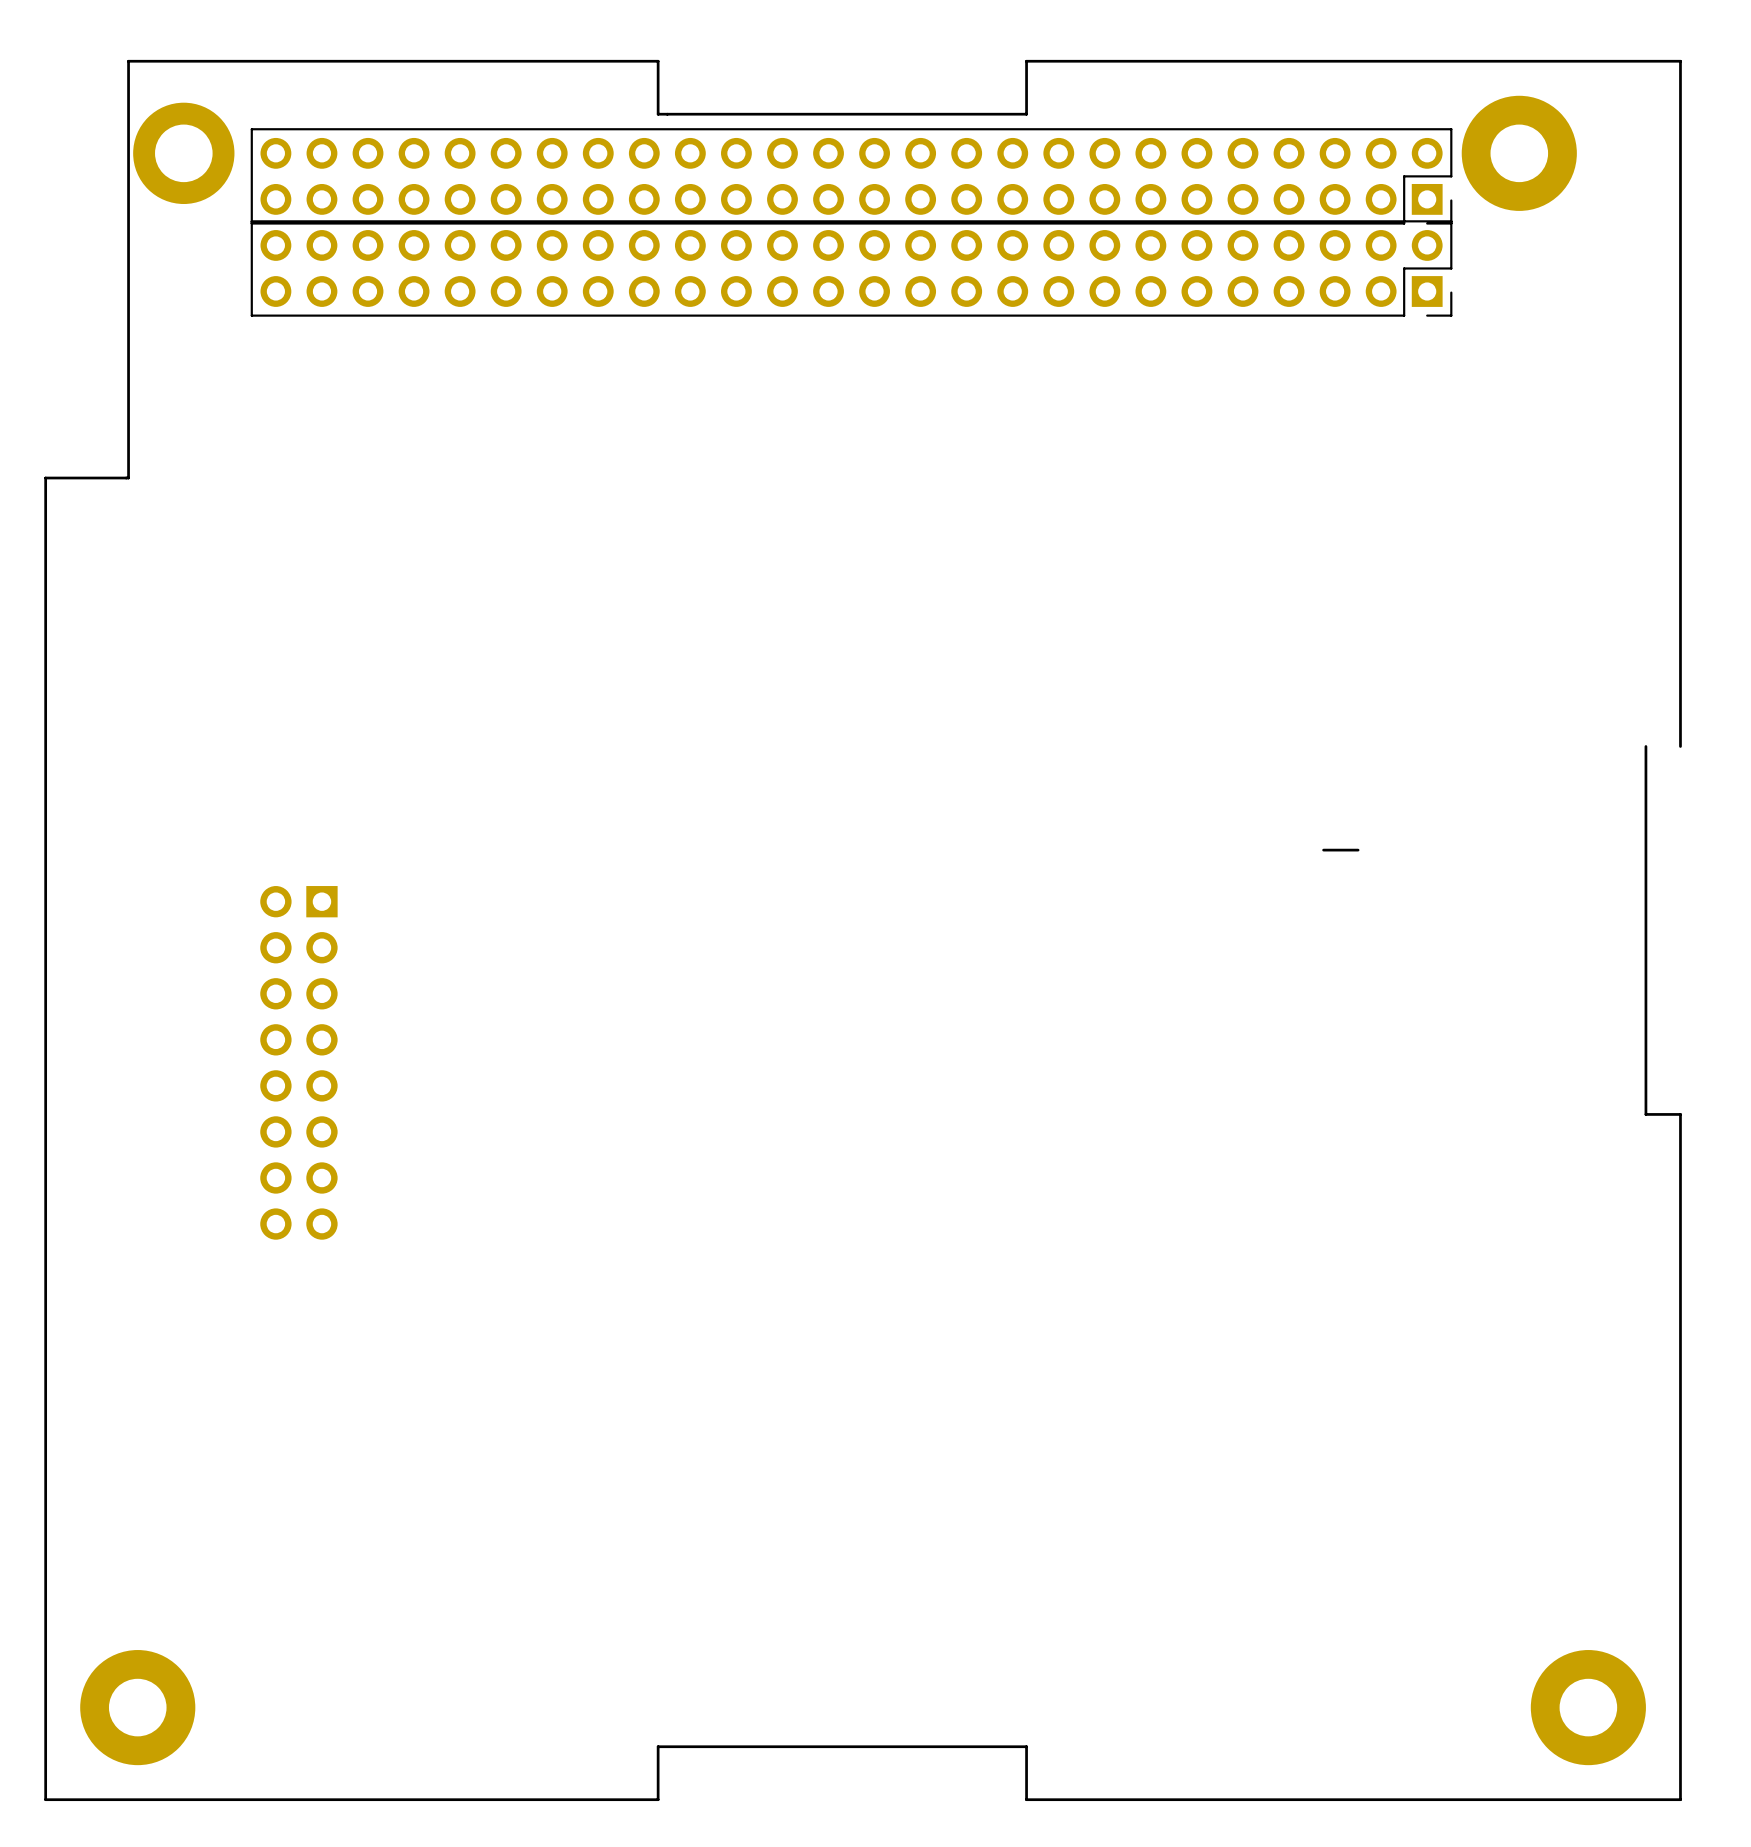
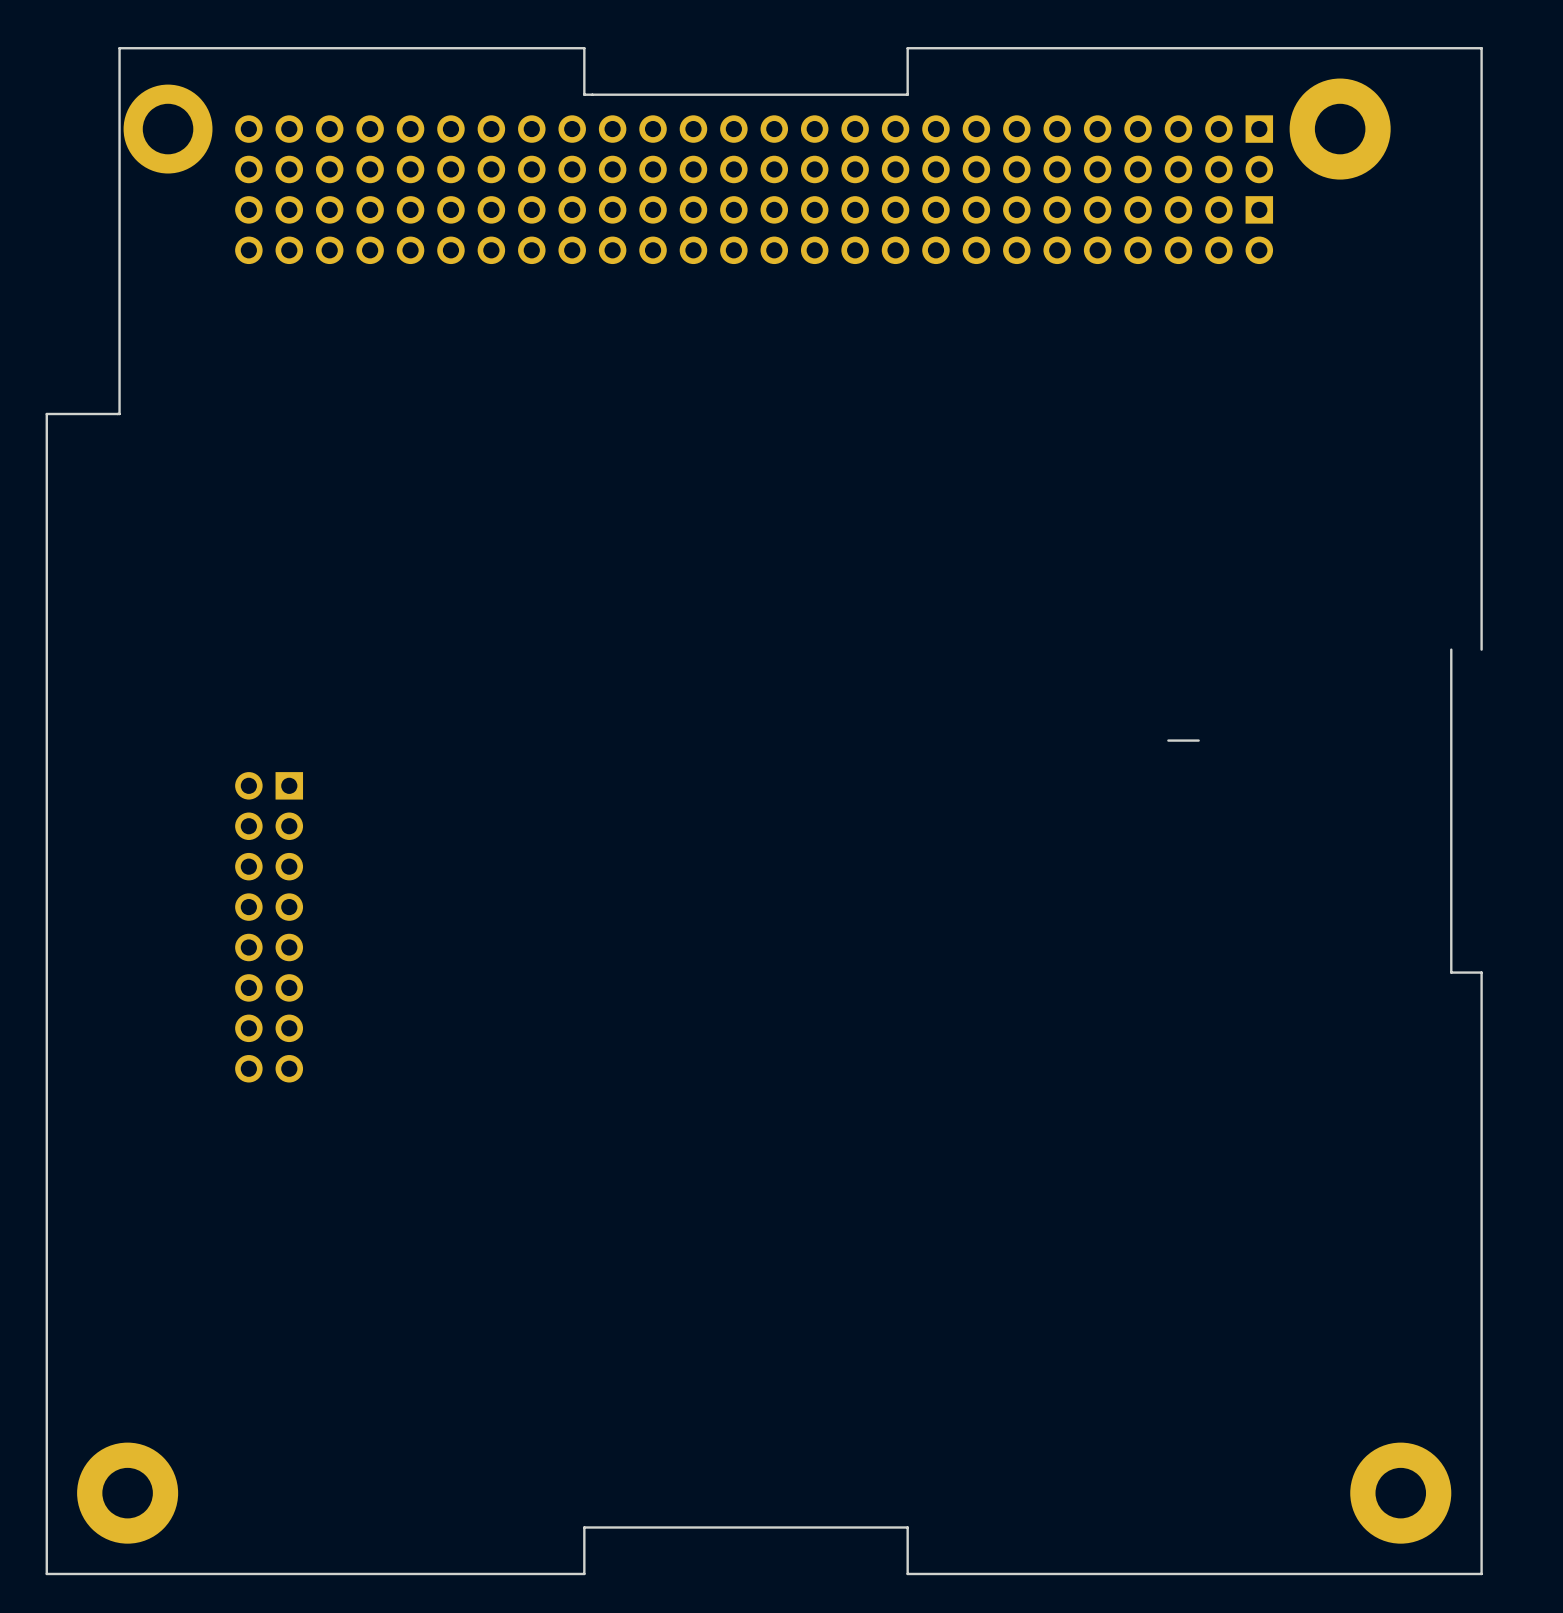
part footprint: [250, 128, 1453, 225] -> [235, 115, 1274, 184]
part footprint: [250, 220, 1453, 317] -> [235, 196, 1274, 265]

